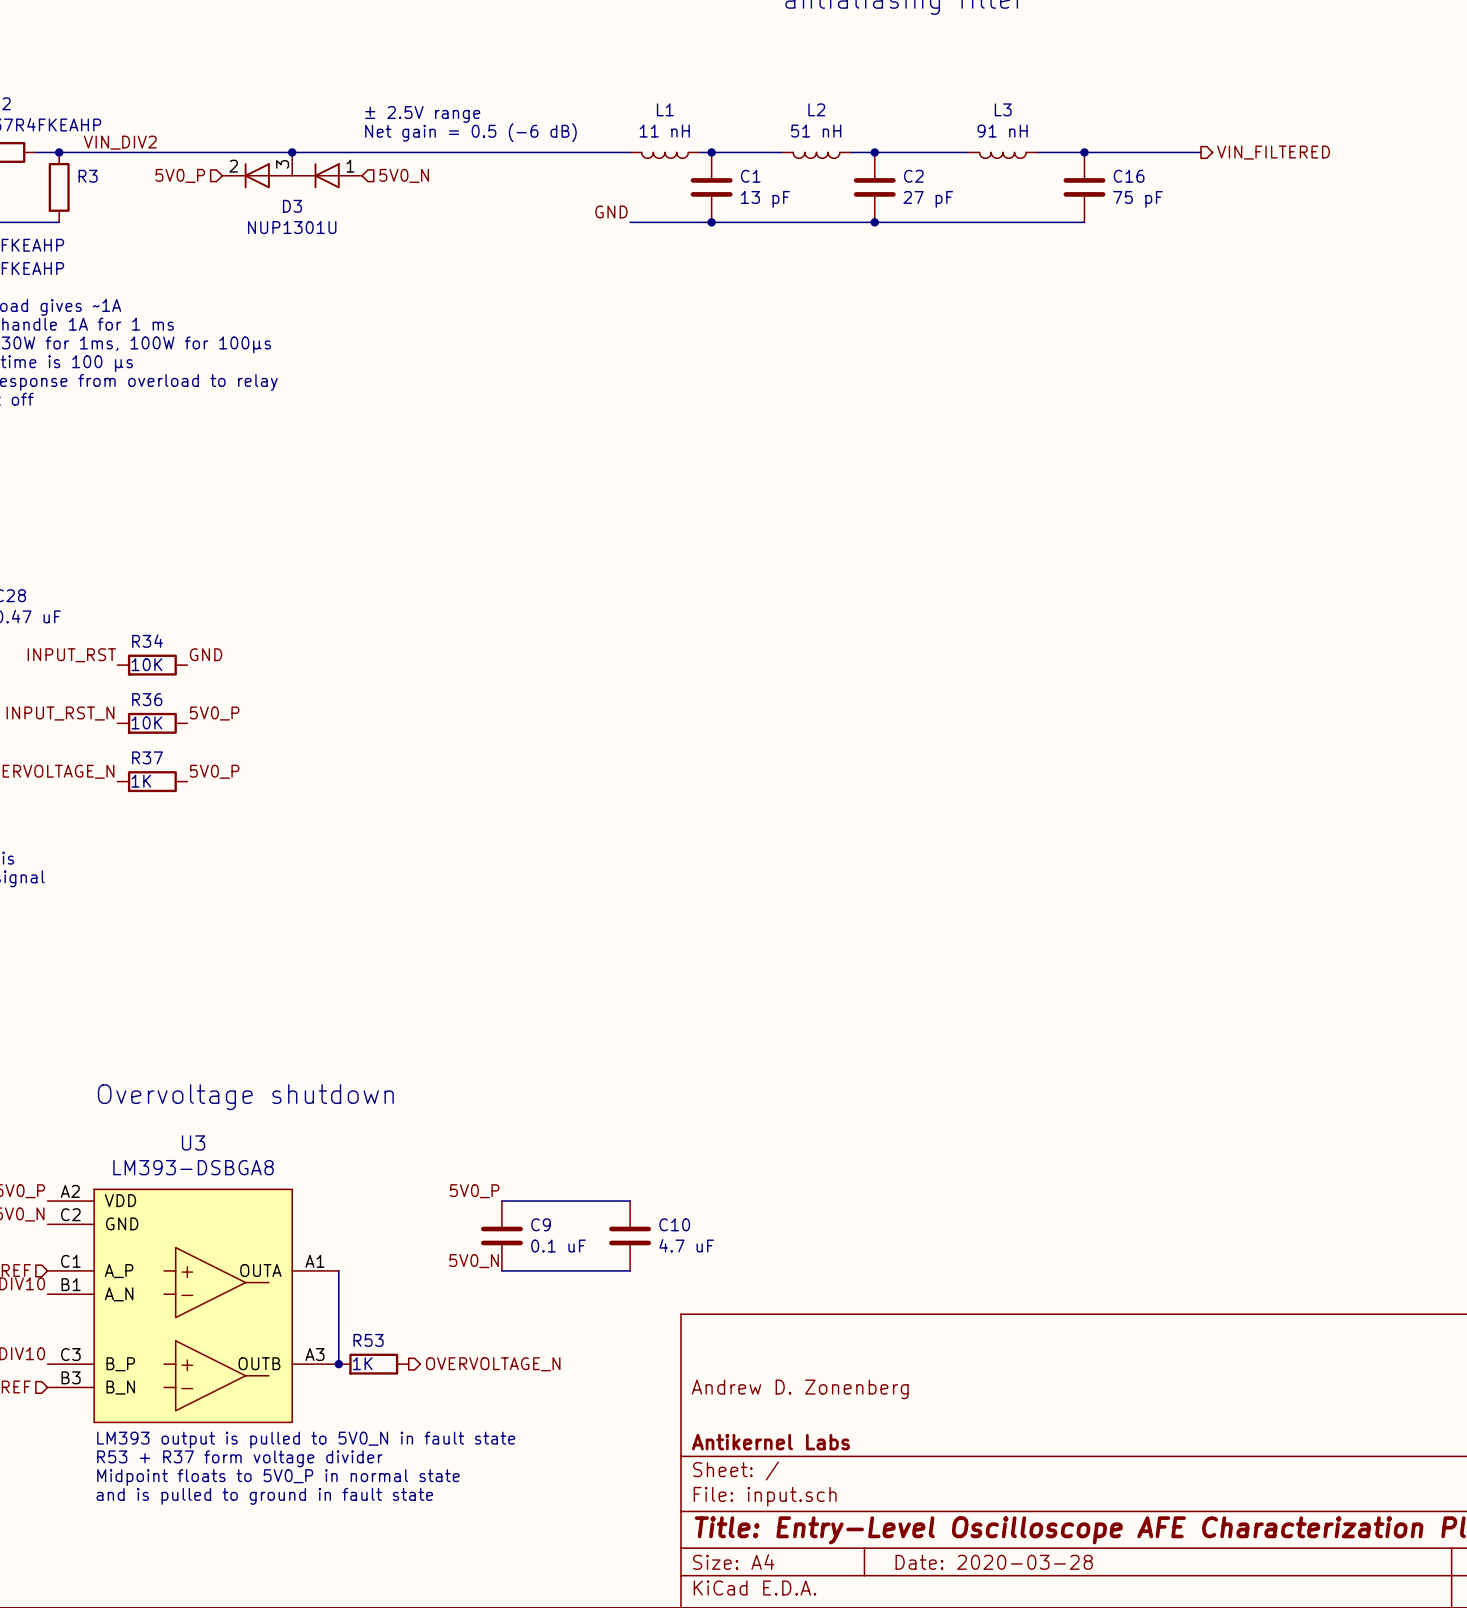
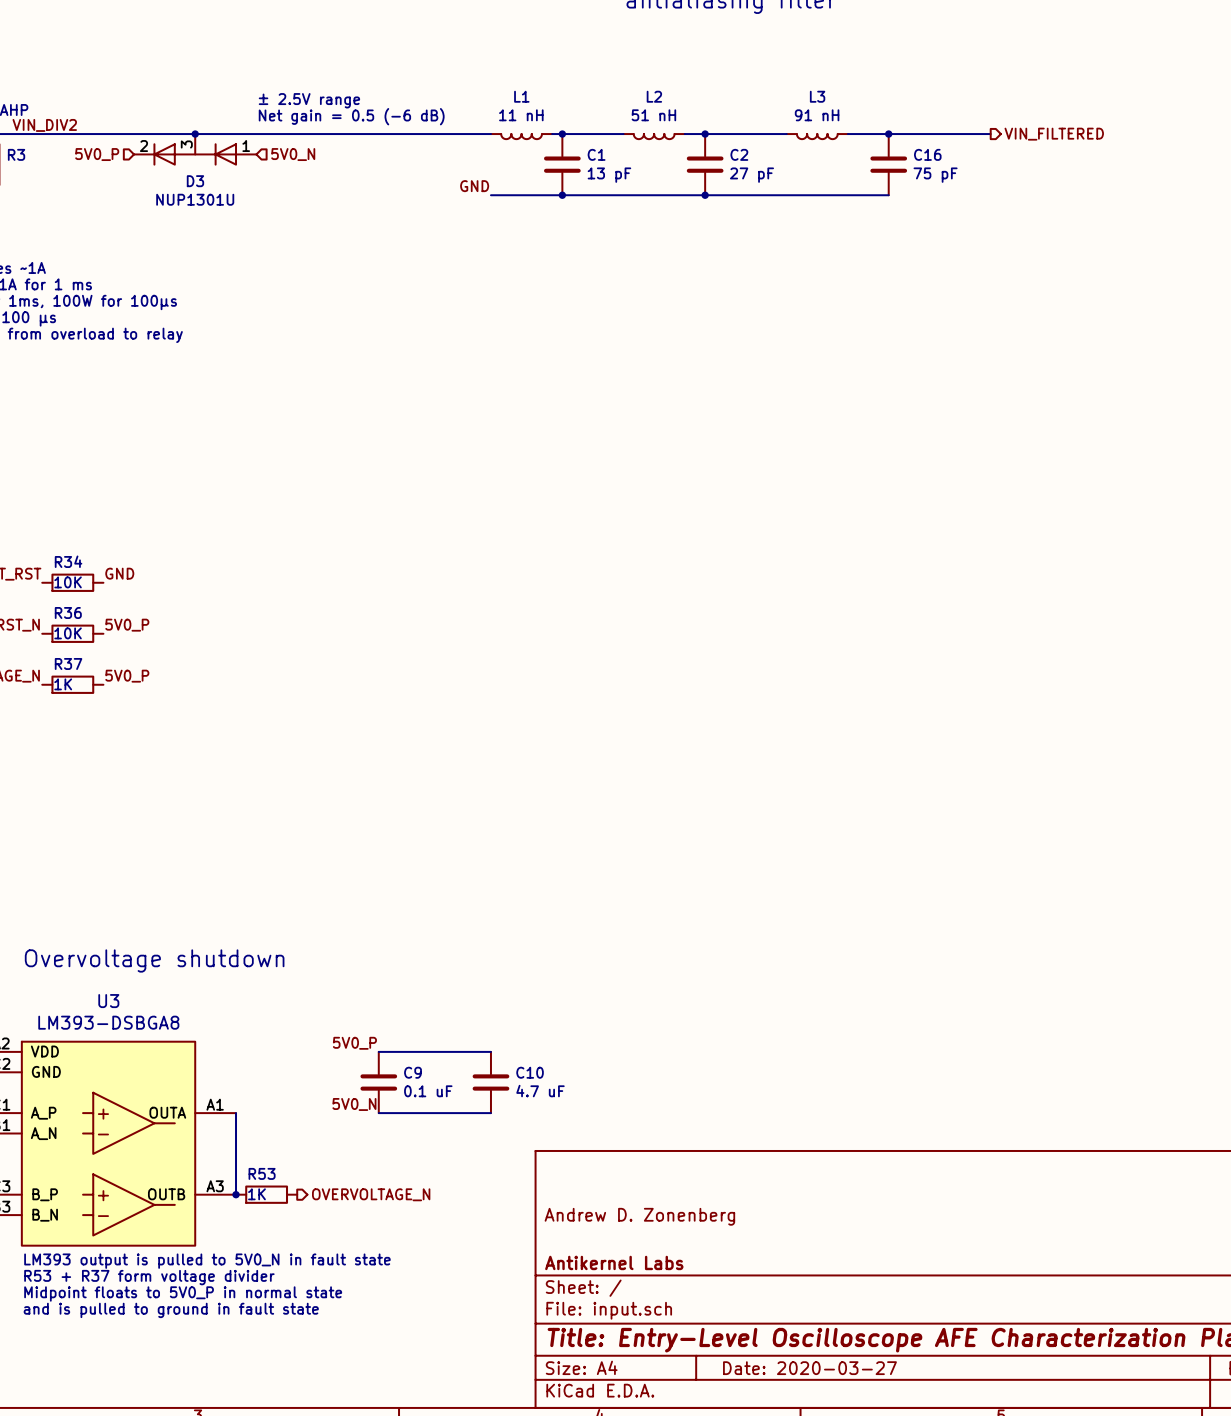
title block: Date: 2020-03-28 (994, 1562) -> Date: 2020-03-27 (809, 1368)

